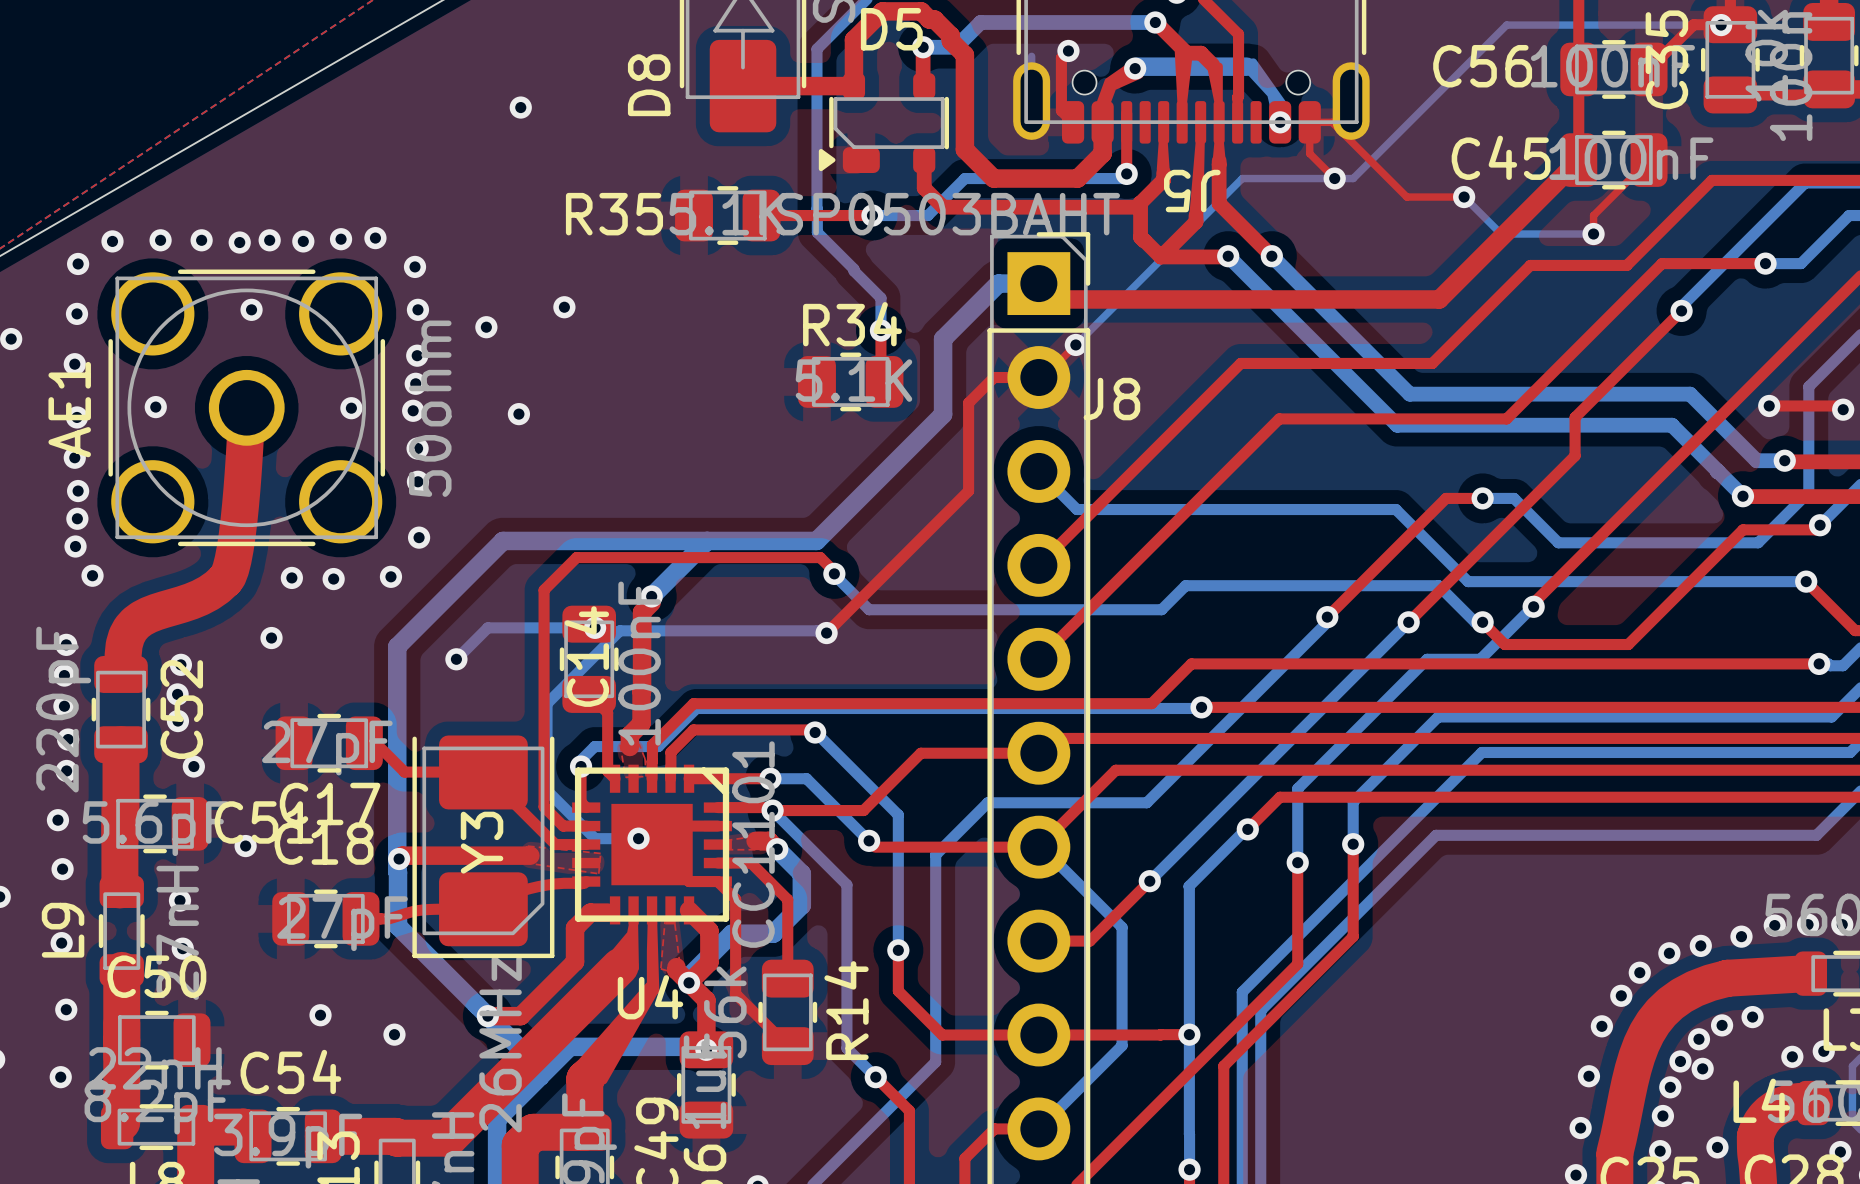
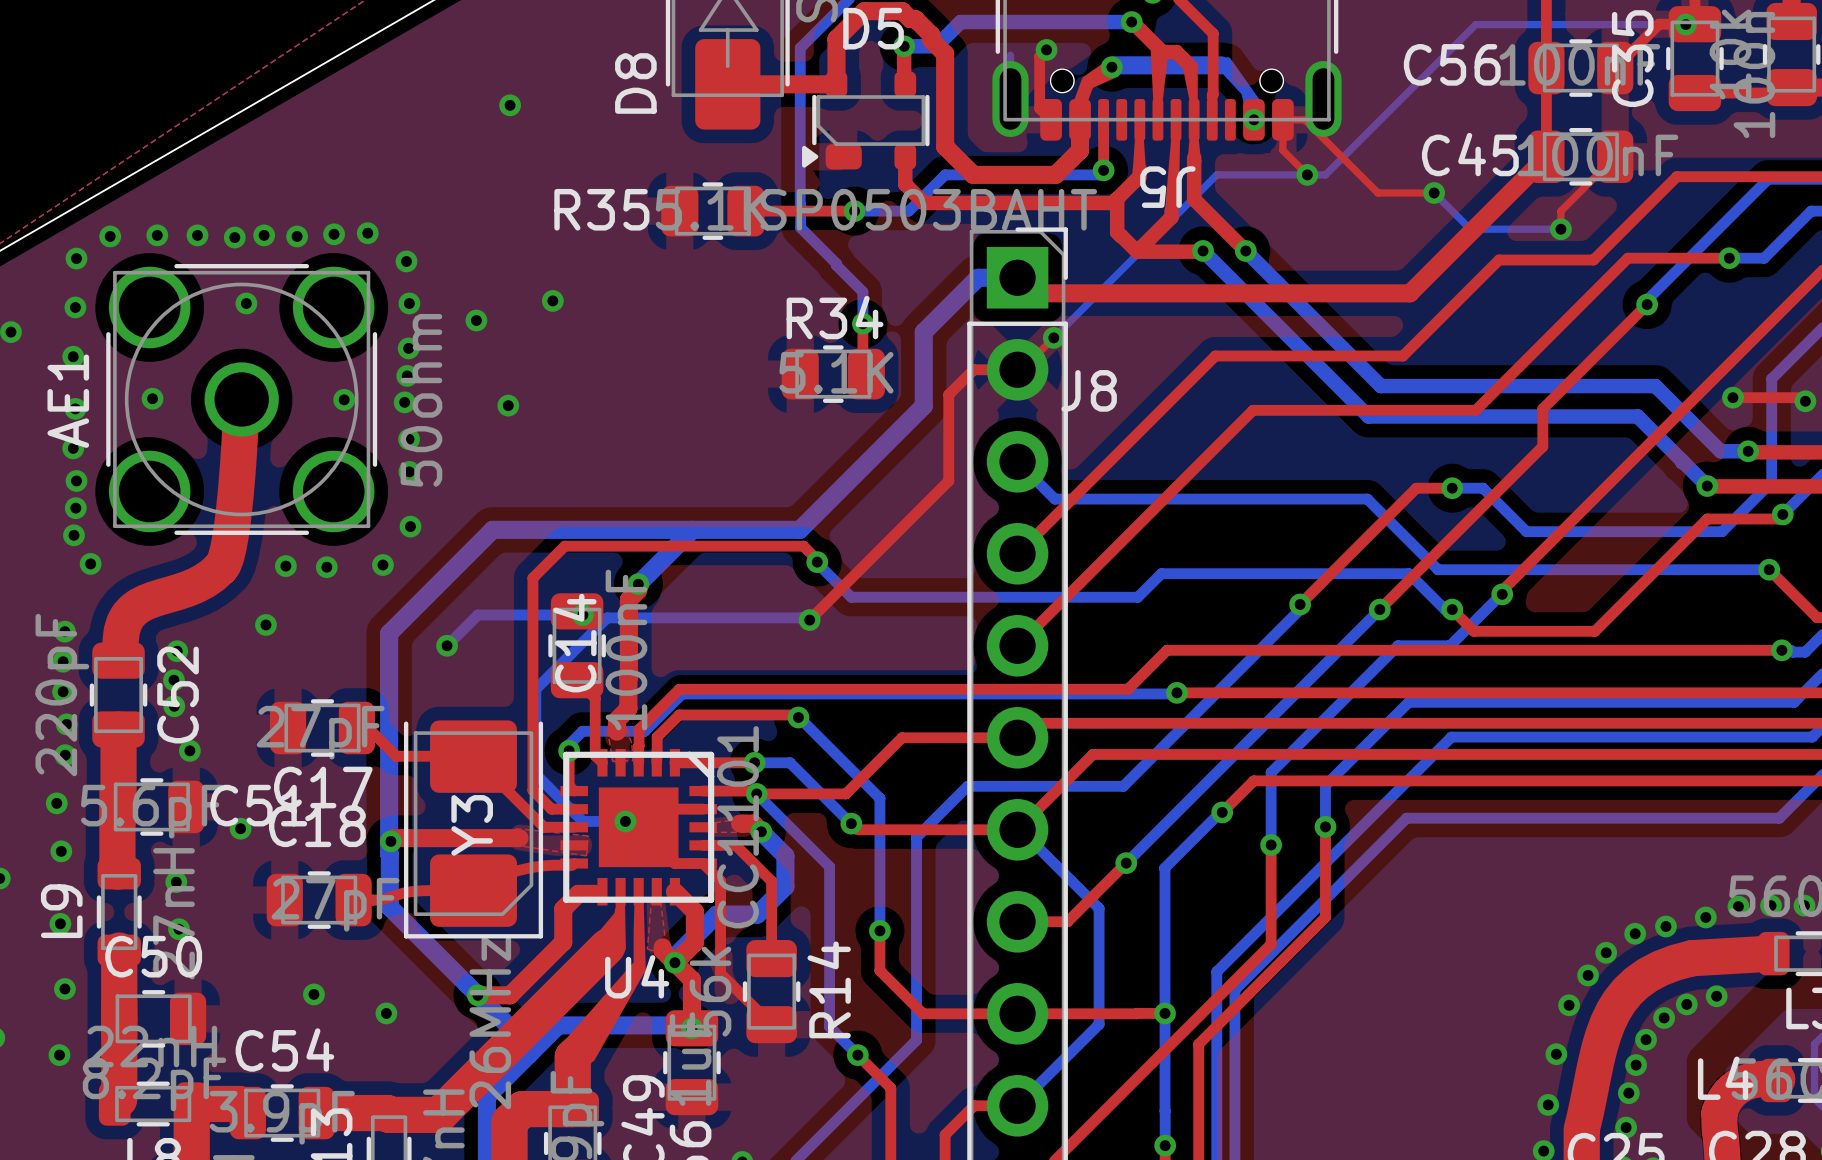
via: (1823, 1051) -> none
via: (1792, 1056) -> none
via: (1702, 1068) -> none
via: (1717, 1147) -> none
via: (1840, 1152) -> none

